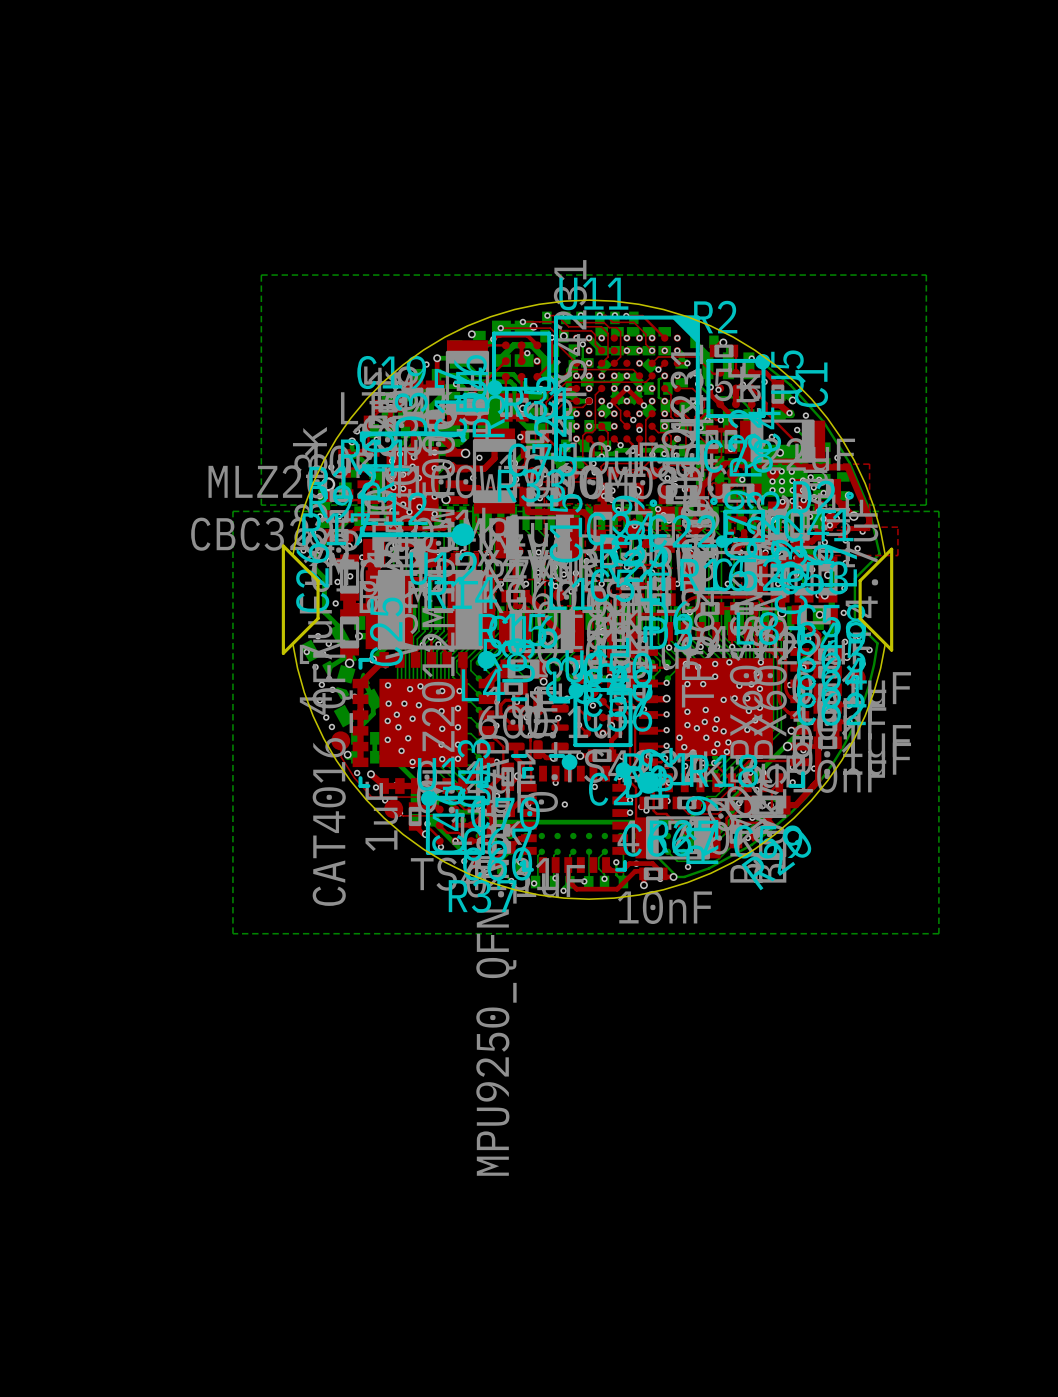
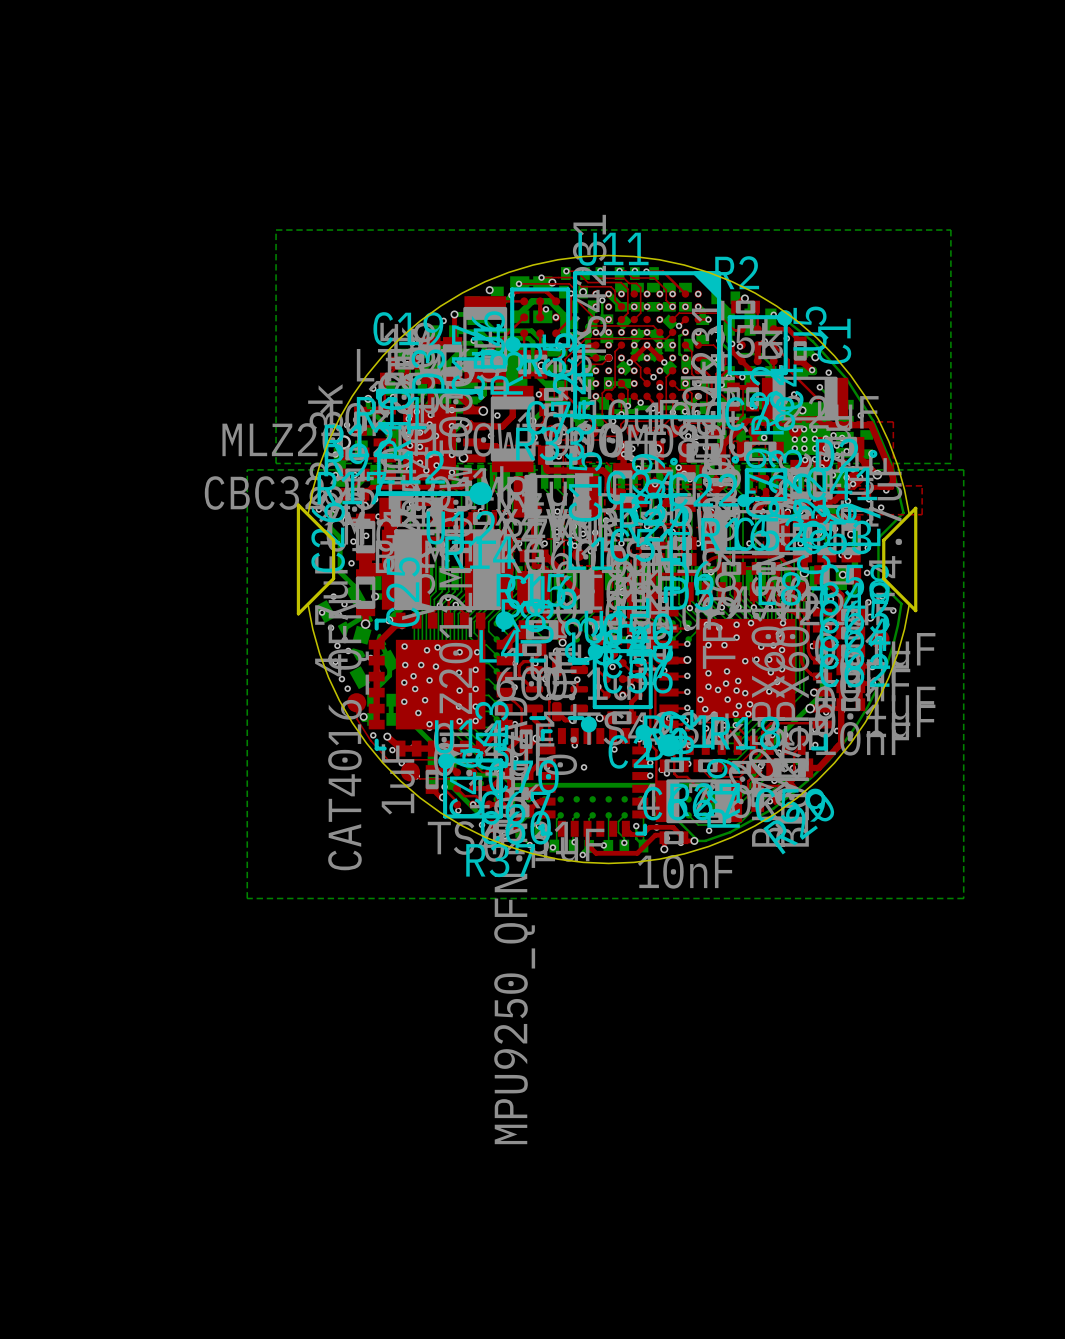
via: none -> (634, 306)

